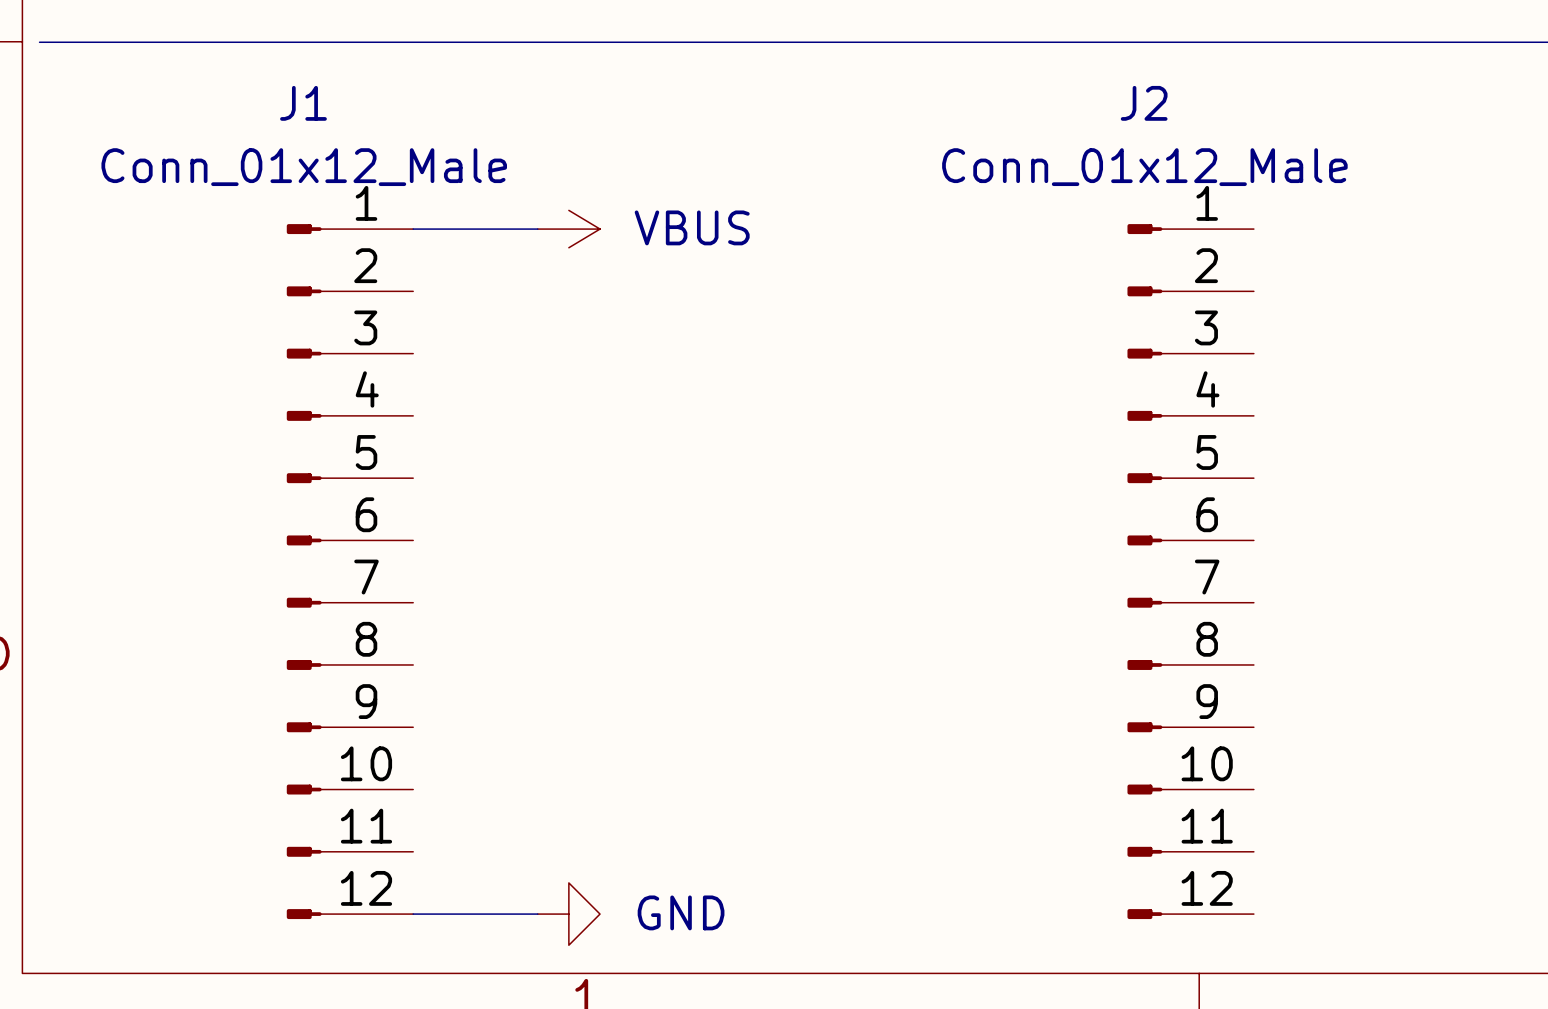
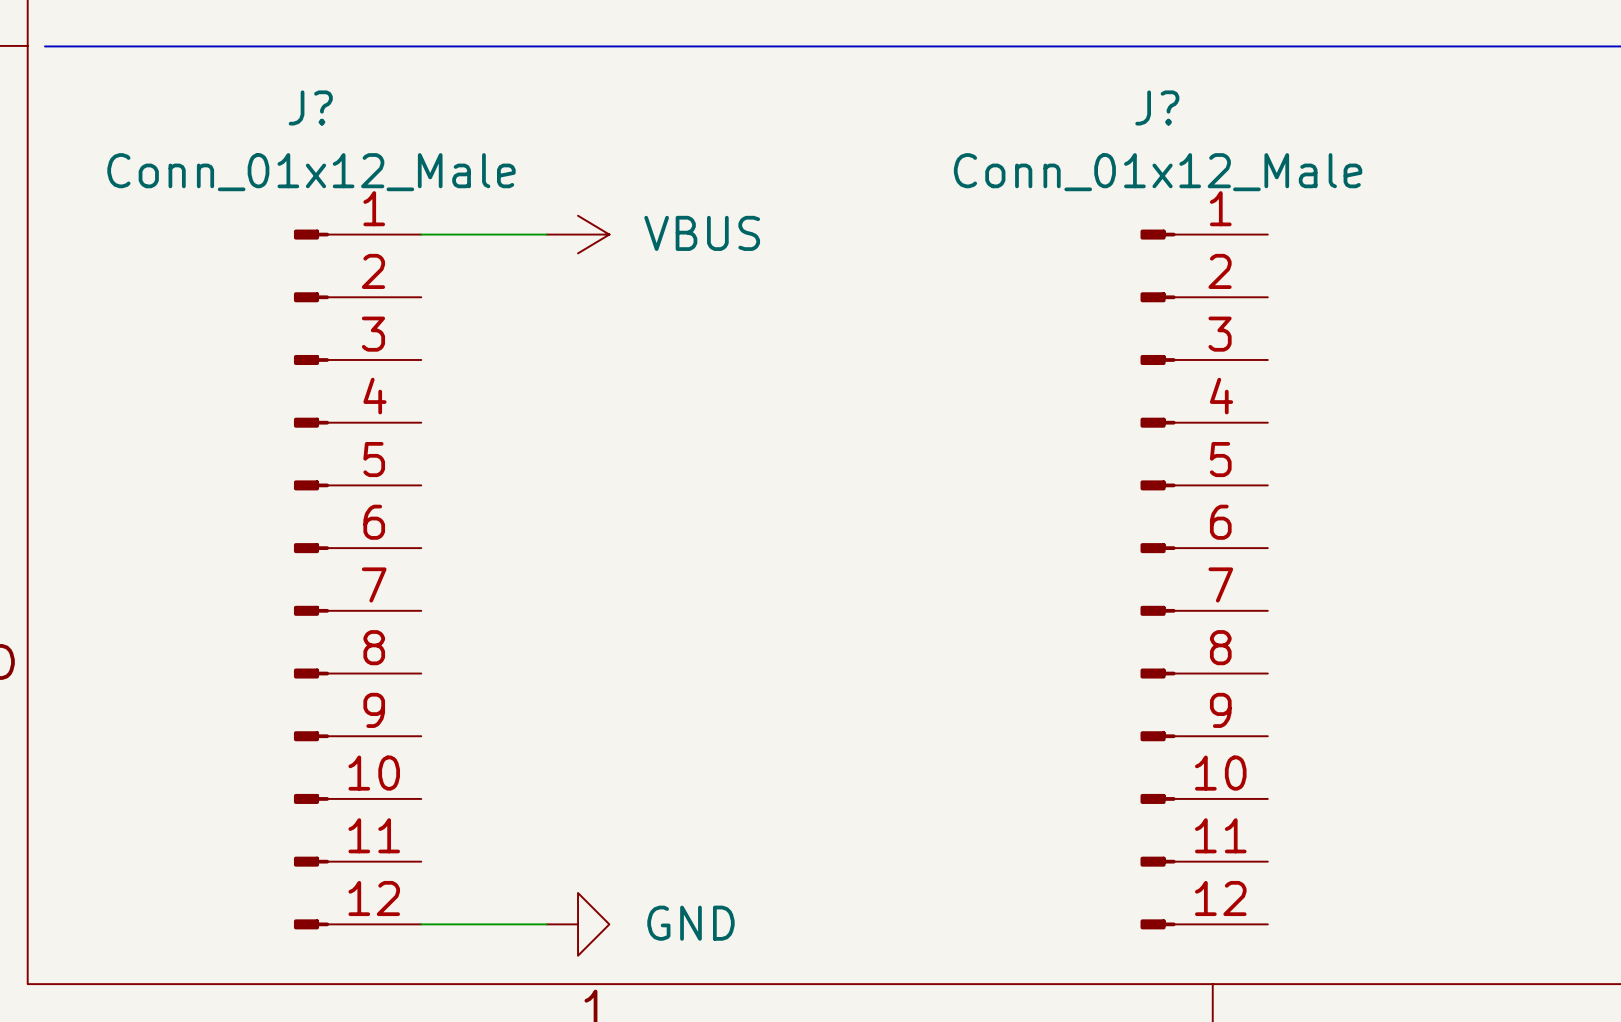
J1 name: J1 (303, 103) -> J? (310, 107)
J2 name: J2 (1144, 103) -> J? (1157, 107)

